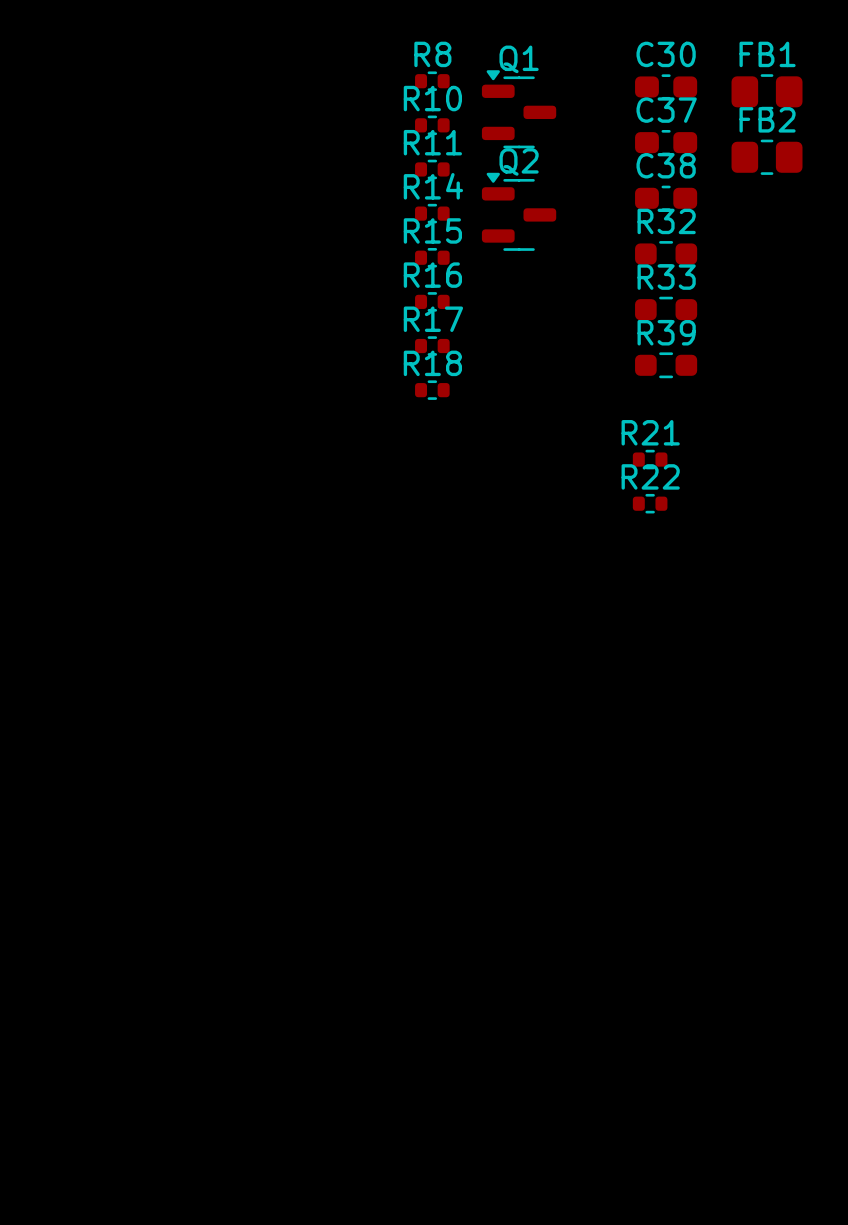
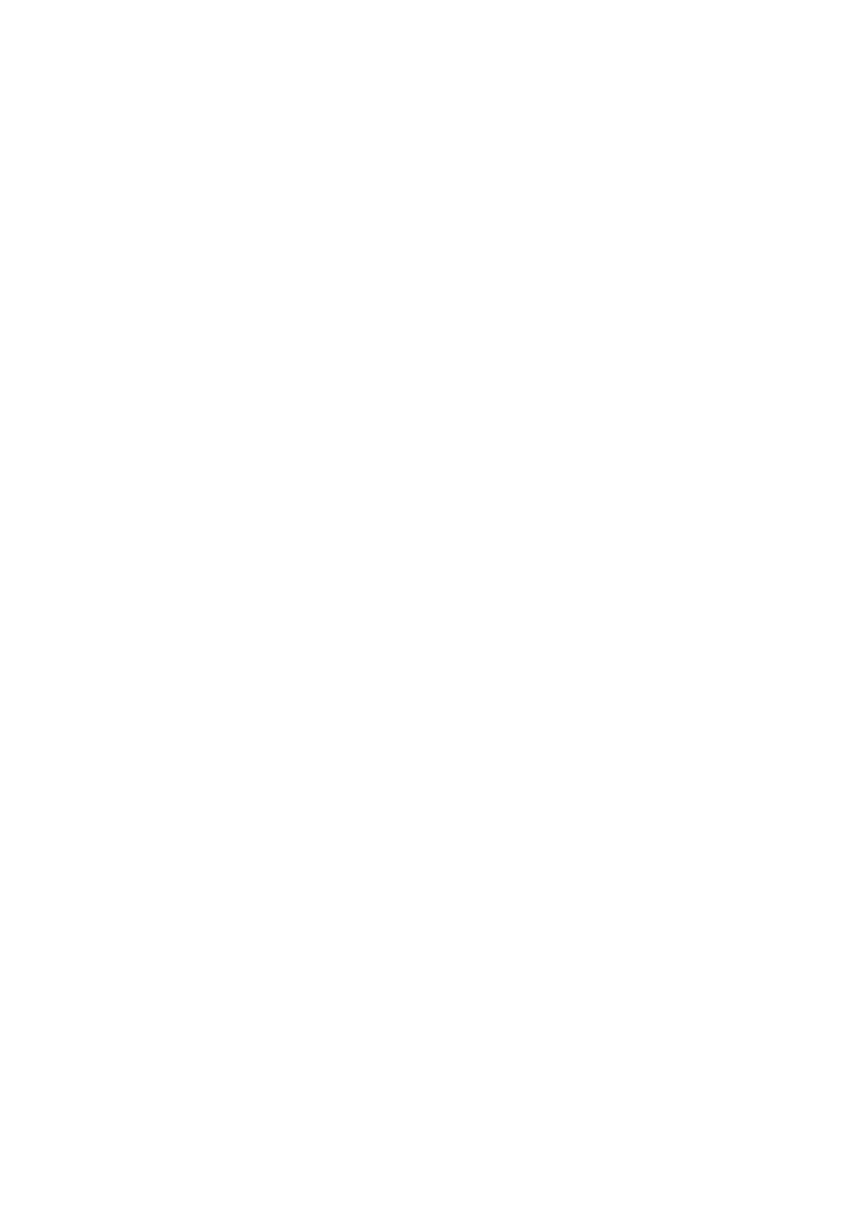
R8: (432, 81) -> none
C30: (666, 86) -> none
FB1: (767, 91) -> none
Q1: (519, 109) -> none
R10: (432, 125) -> none
C37: (666, 142) -> none
FB2: (767, 157) -> none
R11: (432, 169) -> none
C38: (666, 198) -> none
Q2: (519, 211) -> none
R14: (432, 213) -> none
R32: (666, 253) -> none
R15: (432, 257) -> none
R16: (432, 301) -> none
R33: (666, 309) -> none
R17: (432, 346) -> none
R39: (666, 365) -> none
R18: (432, 390) -> none
R21: (650, 459) -> none
R22: (650, 503) -> none

